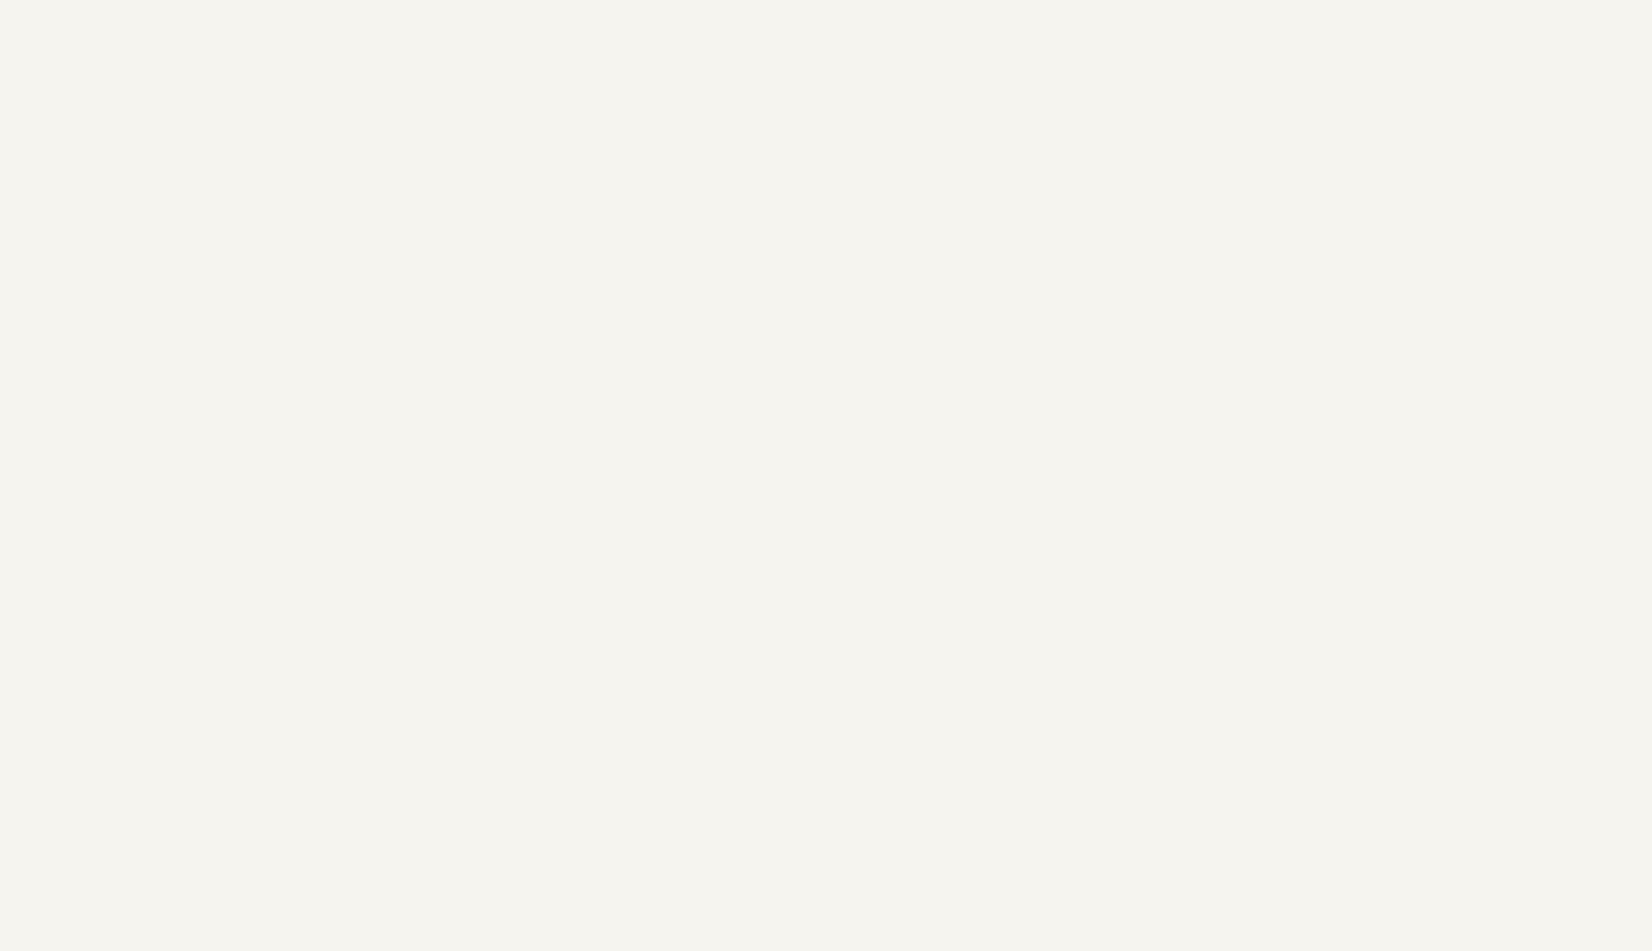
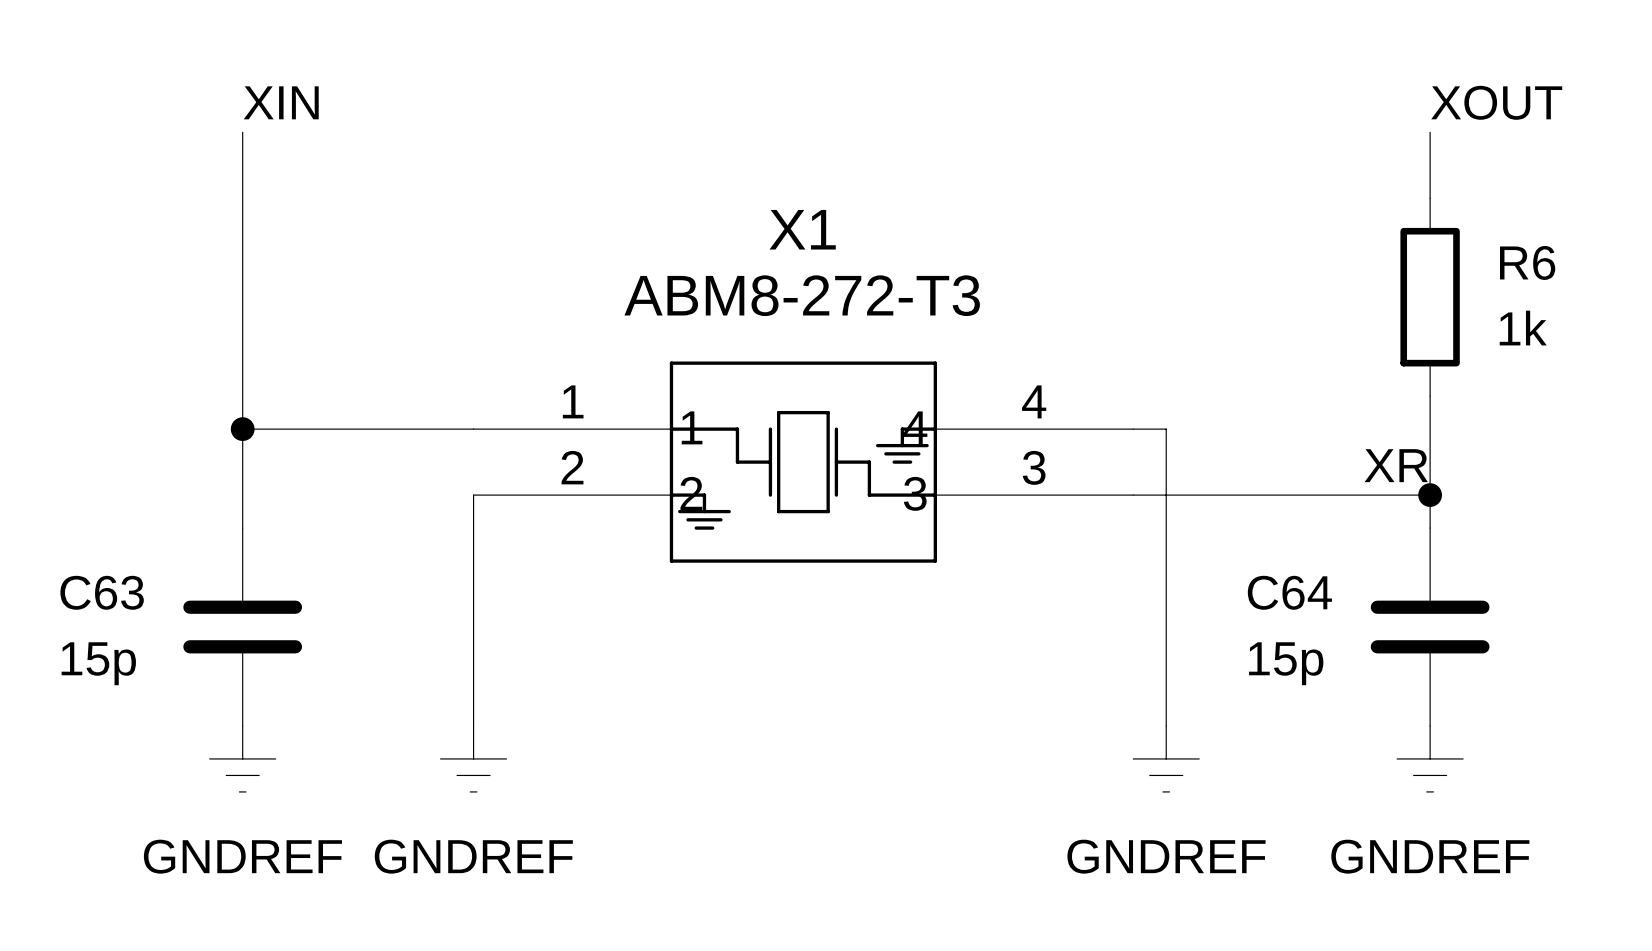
label: none -> XIN (281, 102)
label: none -> XOUT (1496, 102)
wire: none -> (242, 132) (242, 528)
wire: none -> (1430, 132) (1430, 198)
R6: none -> 1k (1430, 297)
wire: none -> (1430, 396) (1430, 528)
wire: none -> (242, 429) (473, 429)
junction: none -> (242, 429)
wire: none -> (1133, 429) (1166, 429) (1166, 725)
X1: none -> ABM8-272-T3 (803, 462)
label: none -> XR (1396, 465)
wire: none -> (473, 495) (473, 725)
wire: none -> (1133, 495) (1430, 495)
junction: none -> (1430, 495)
C63: none -> 15p (242, 627)
C64: none -> 15p (1430, 627)
power symbol: none -> GNDREF (242, 758)
power symbol: none -> GNDREF (473, 758)
power symbol: none -> GNDREF (1166, 758)
power symbol: none -> GNDREF (1430, 758)

